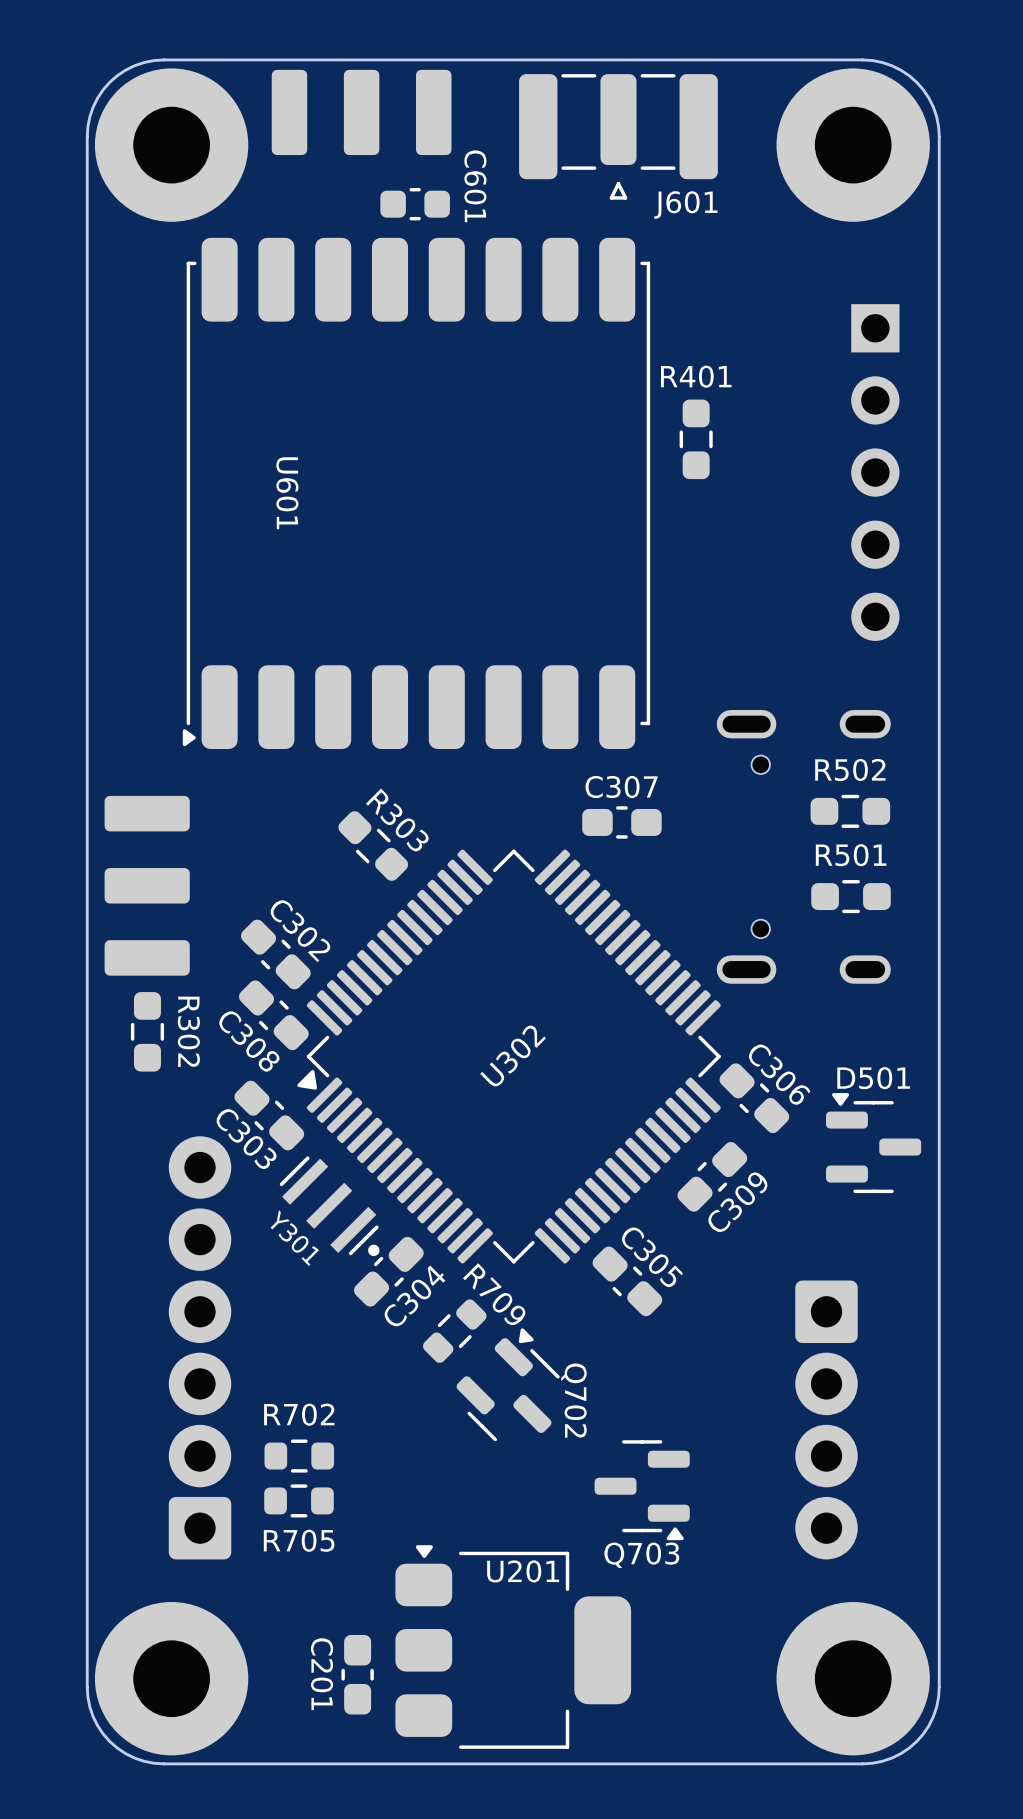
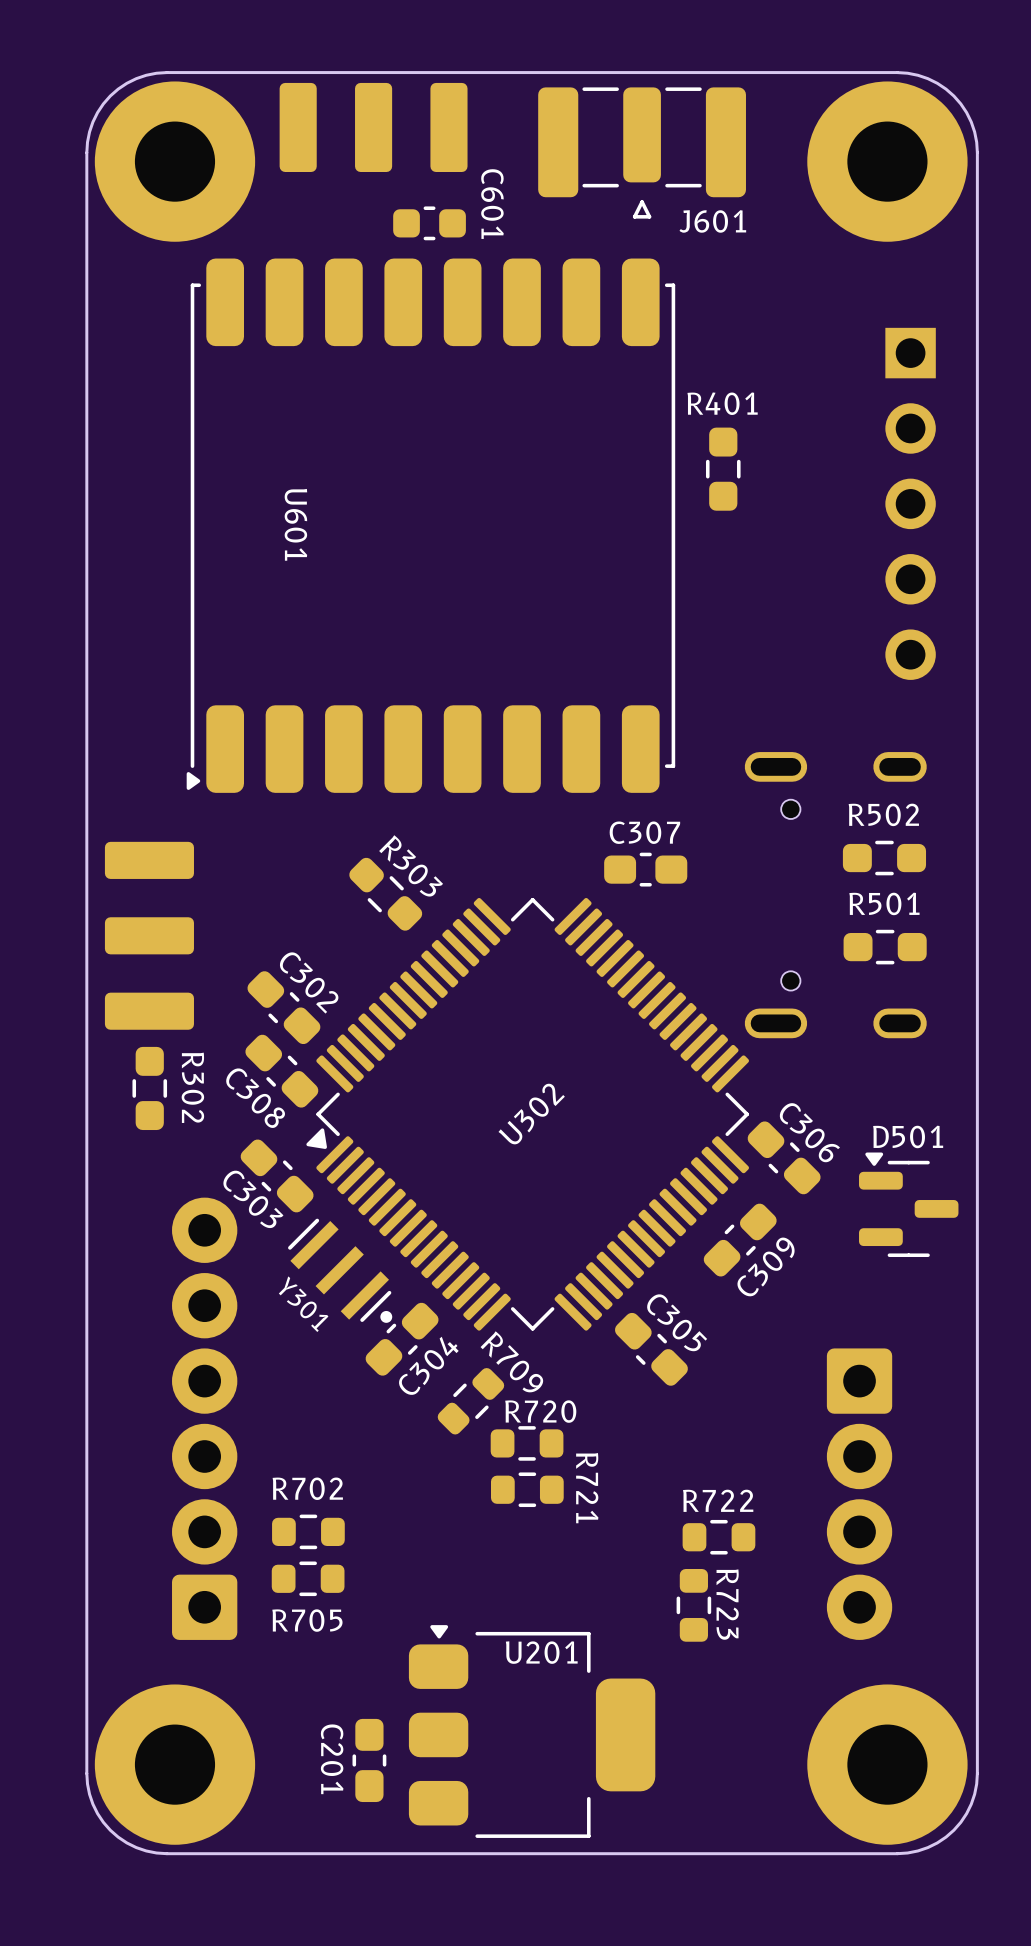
R720: none -> (527, 1443)
Q702: (508, 1384) -> none
R721: none -> (527, 1489)
R722: none -> (718, 1537)
Q703: (642, 1490) -> none
R723: none -> (693, 1605)

